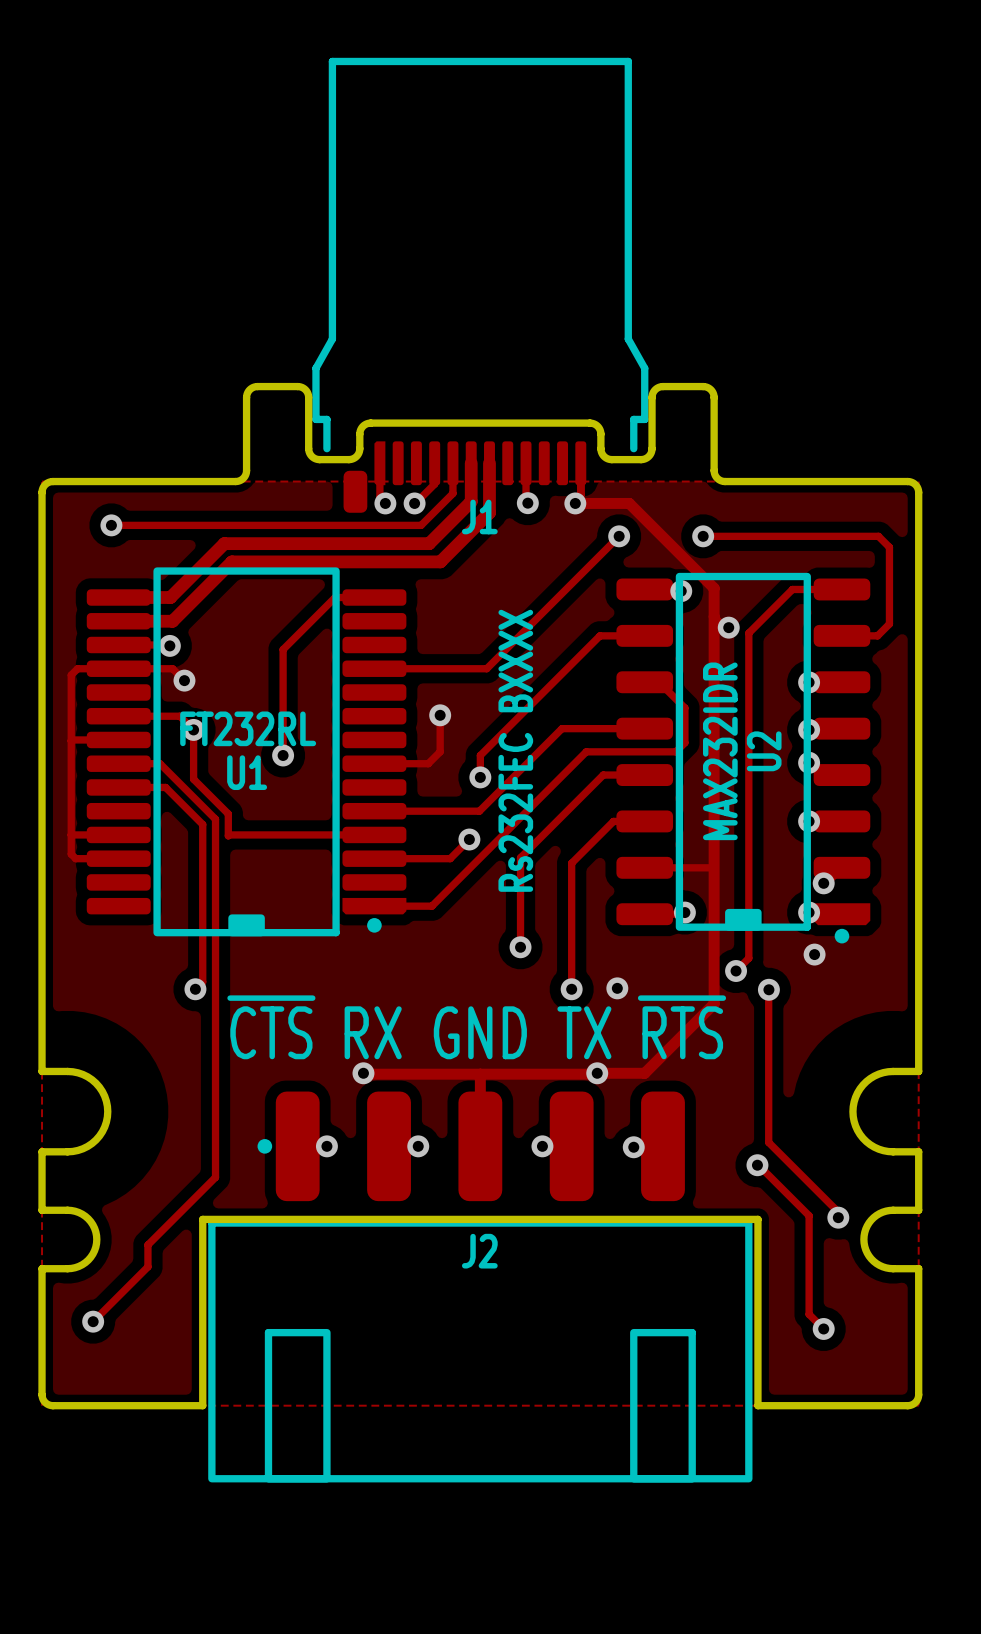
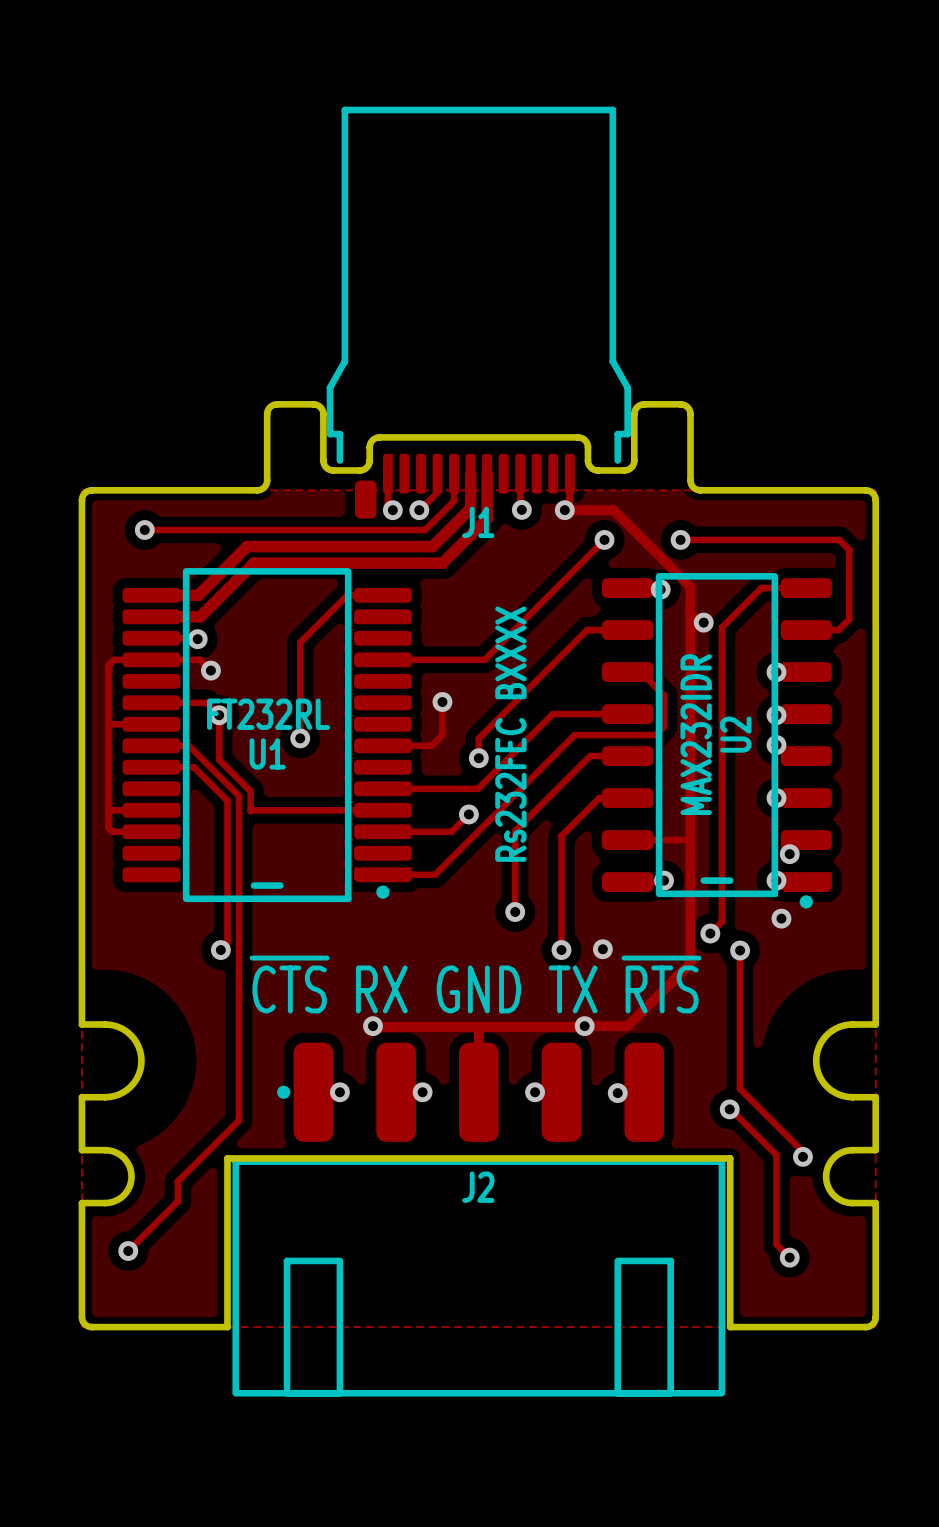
U1 footprint: [86, 567, 407, 937] -> [122, 568, 412, 903]
U2 footprint: [616, 572, 871, 944] -> [602, 573, 832, 909]

